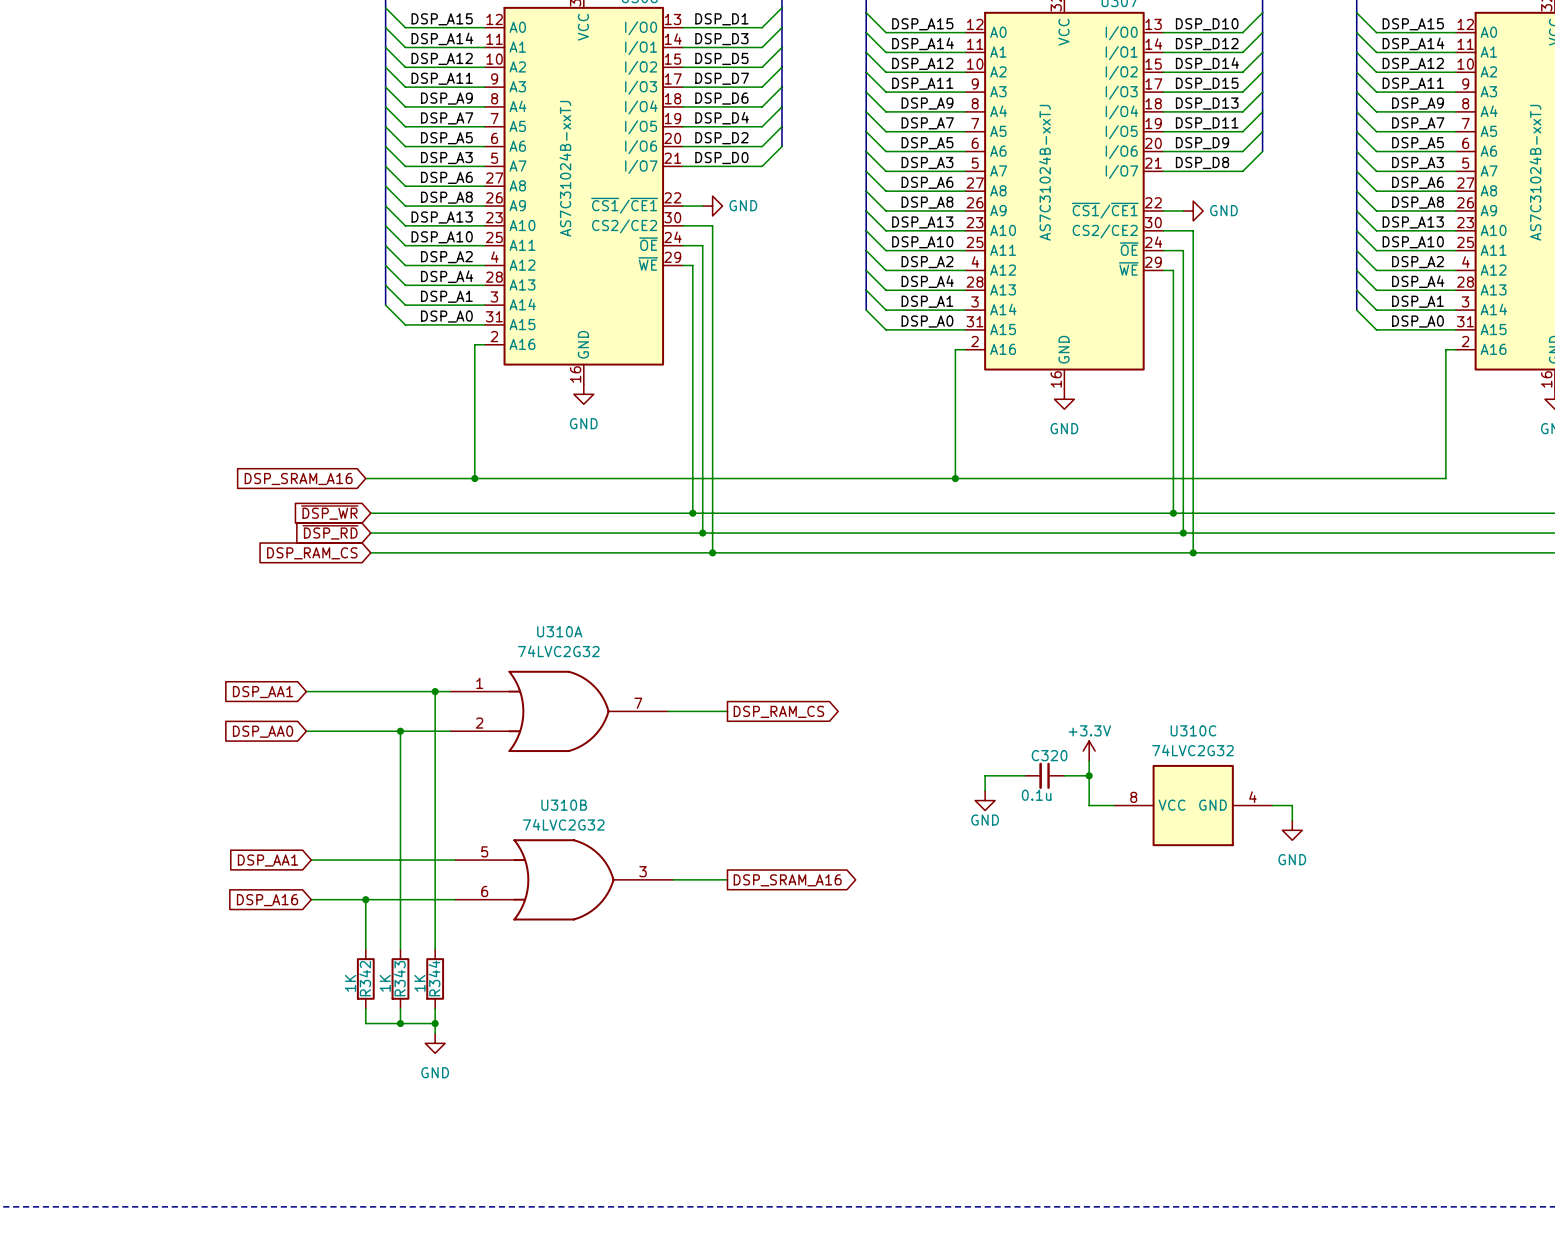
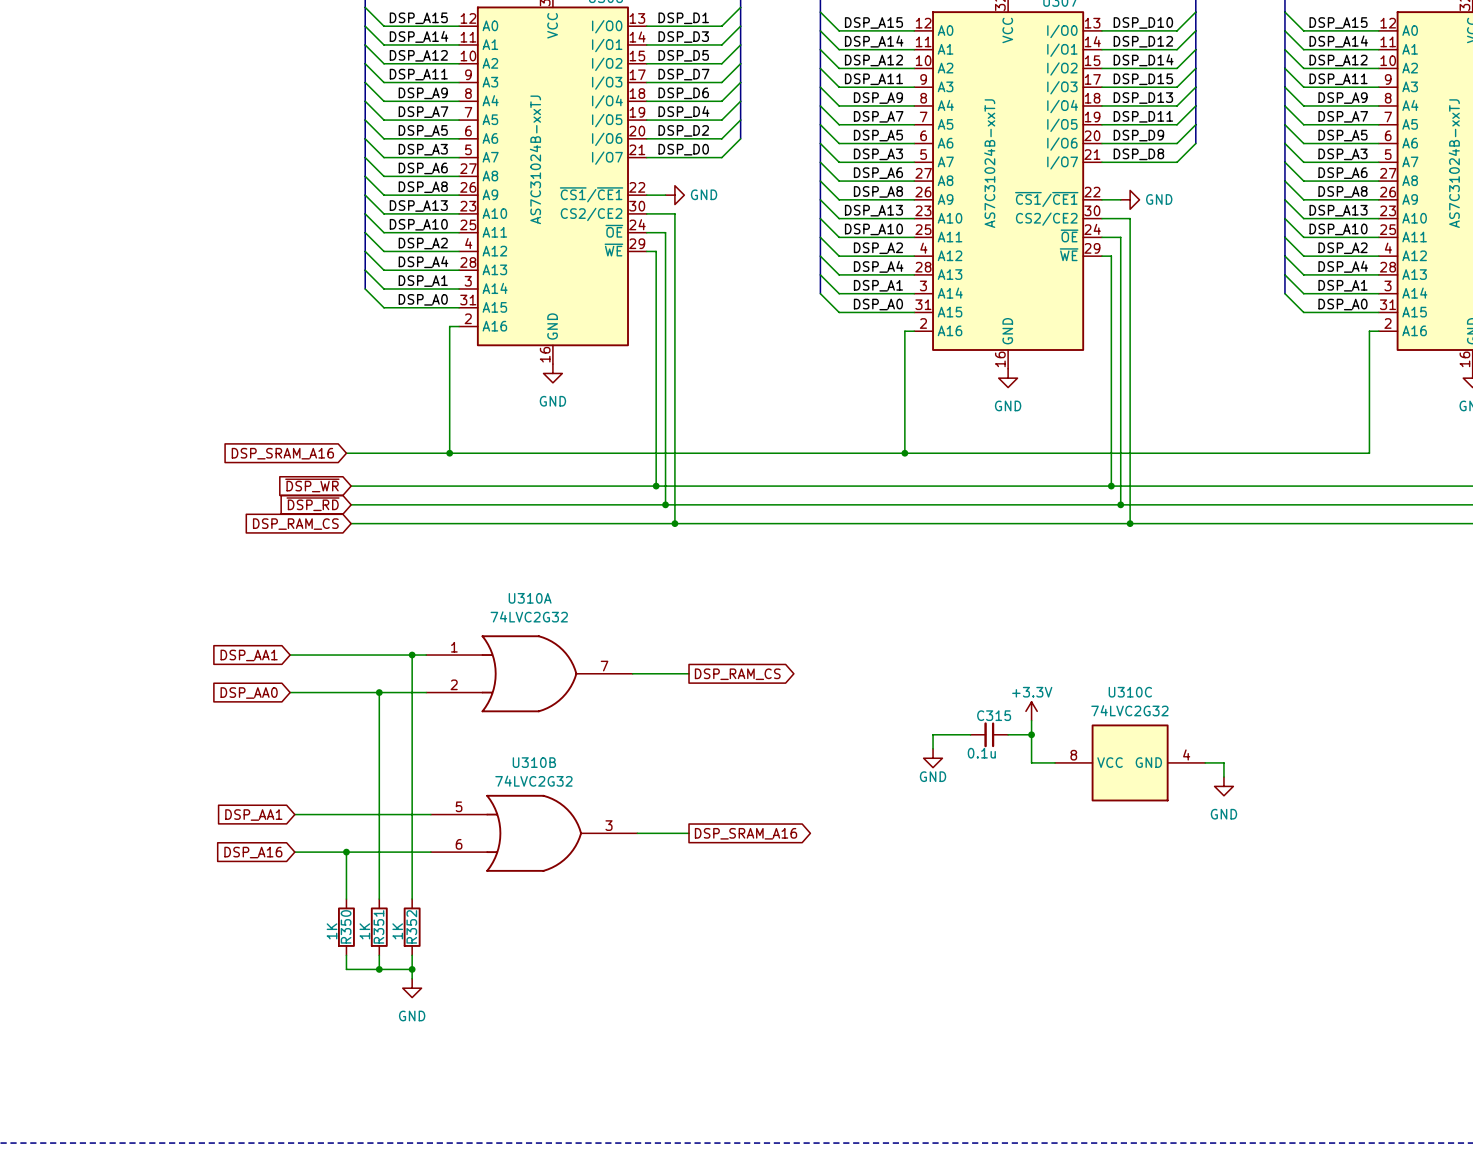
C320 name: C320 (1049, 755) -> C315 (994, 715)
R342 name: R342 (365, 978) -> R350 (346, 926)
R343 name: R343 (399, 978) -> R351 (378, 926)
R344 name: R344 (434, 978) -> R352 (411, 926)

